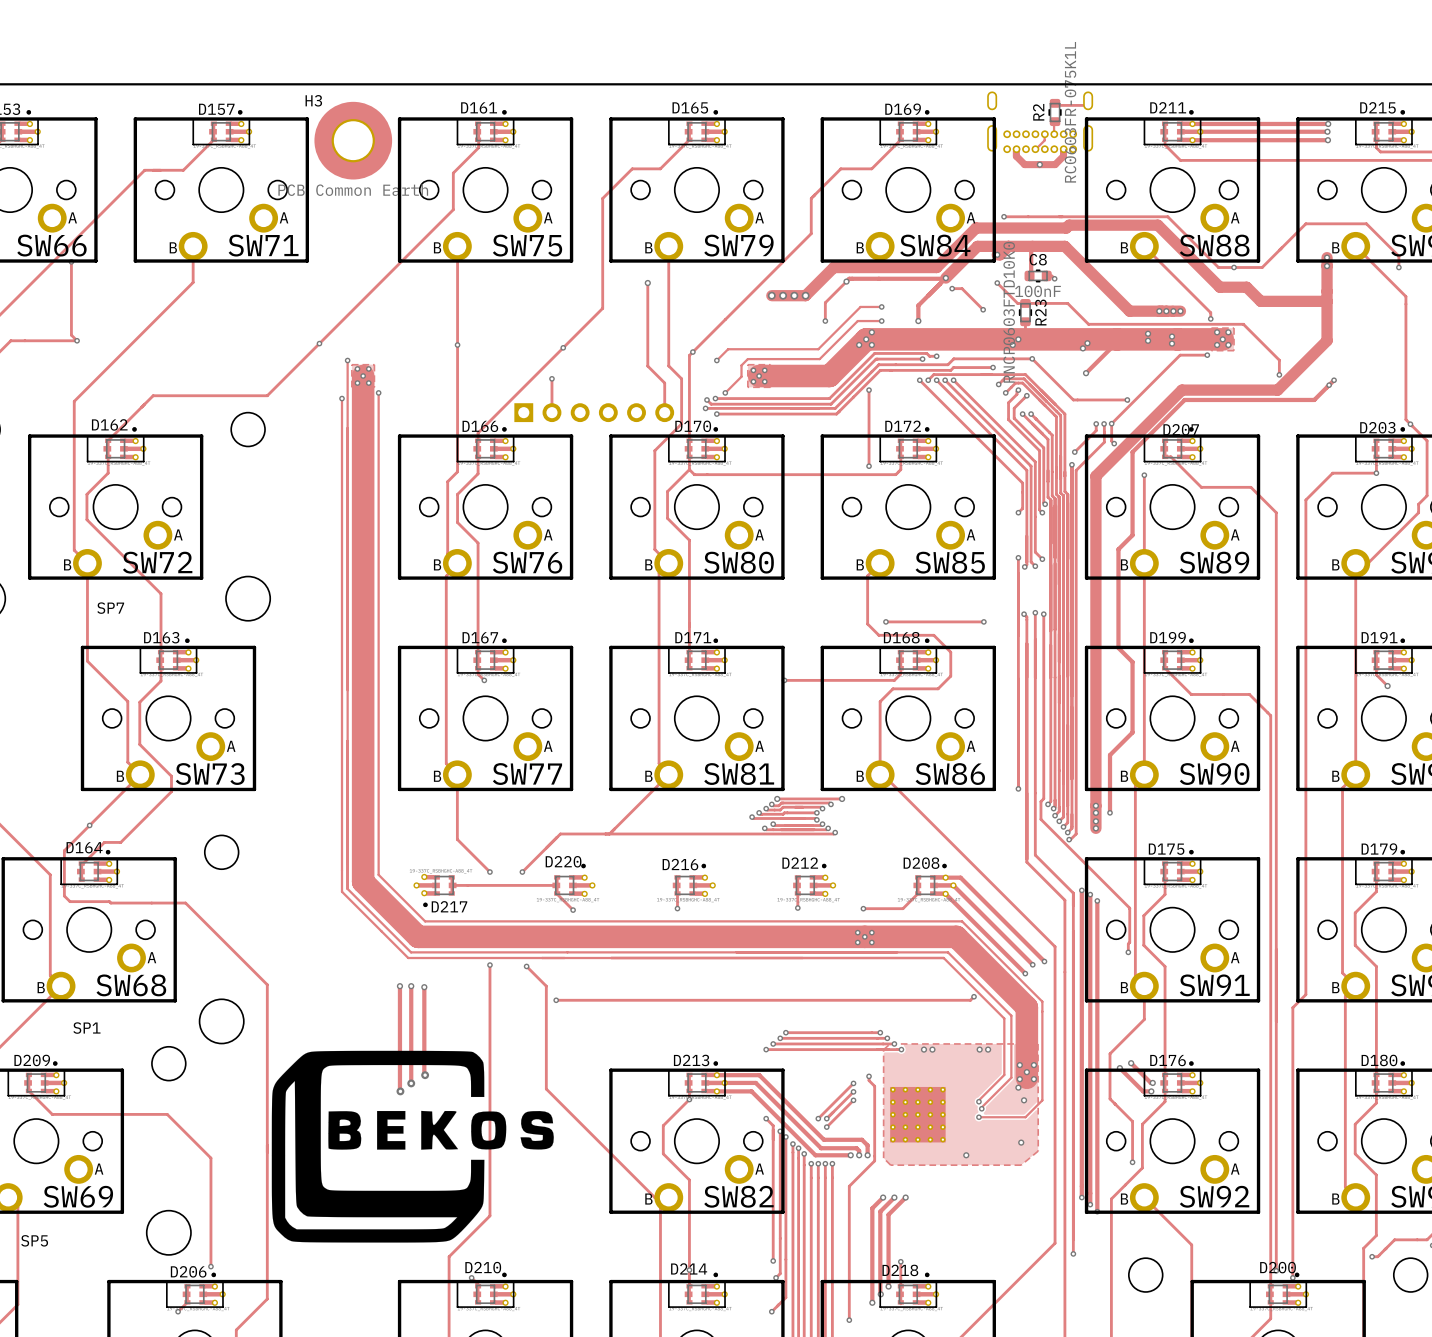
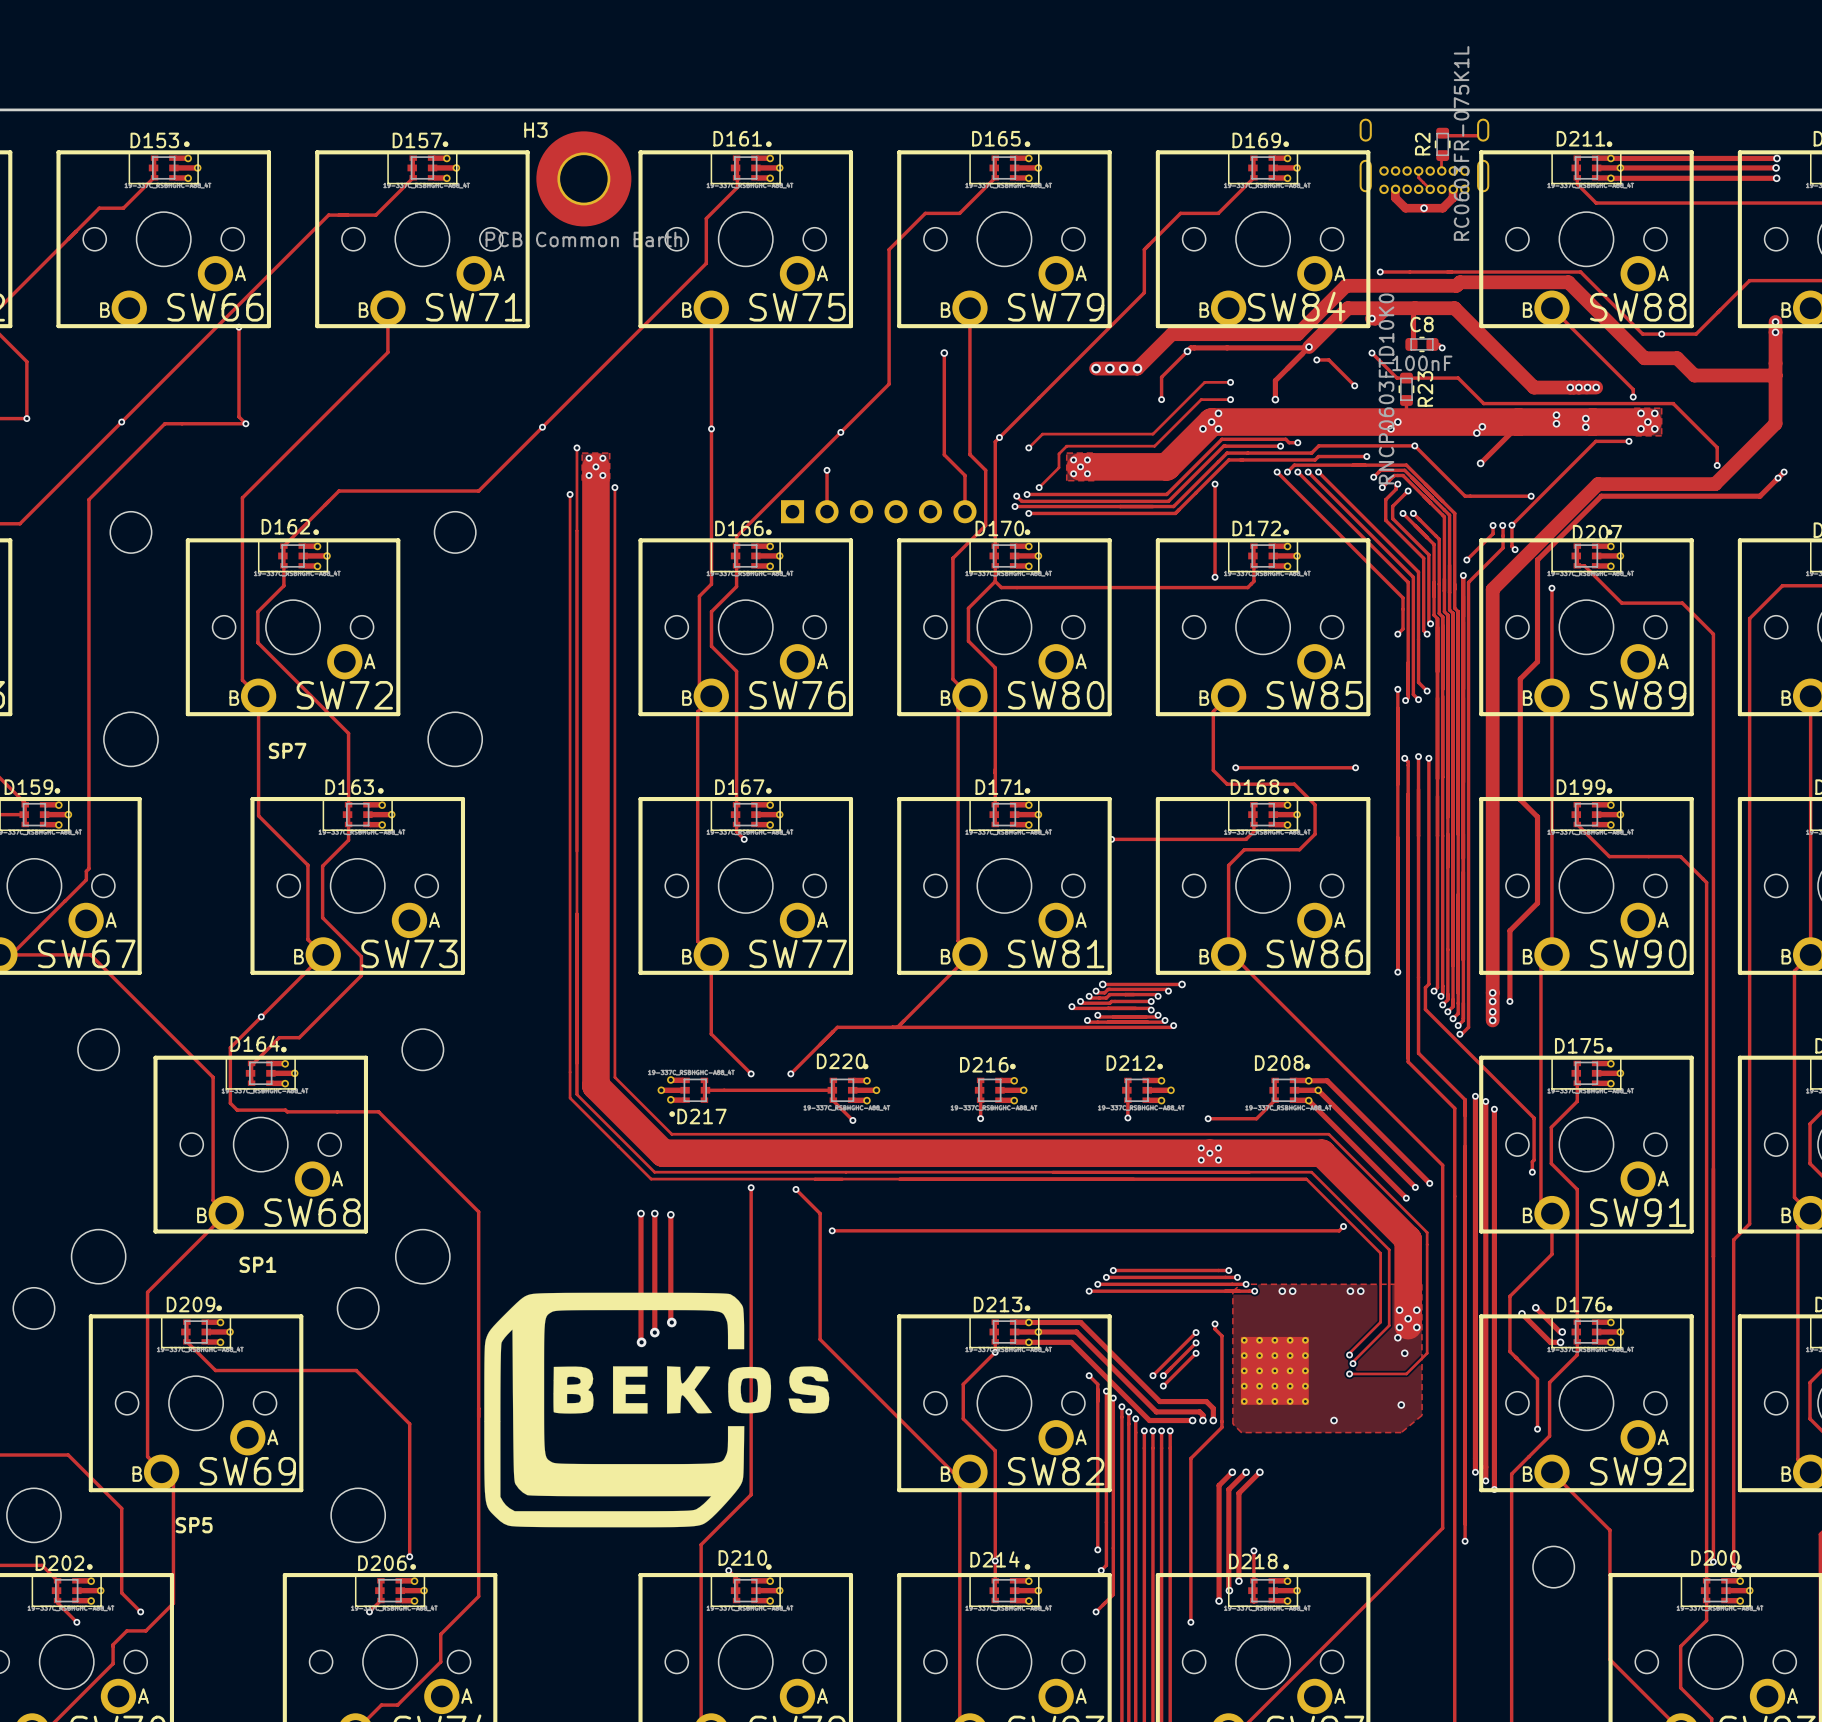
track: none -> (1418, 171) (1418, 177) (1430, 189)
track: (1044, 136) (1044, 140) (1035, 149) -> none

